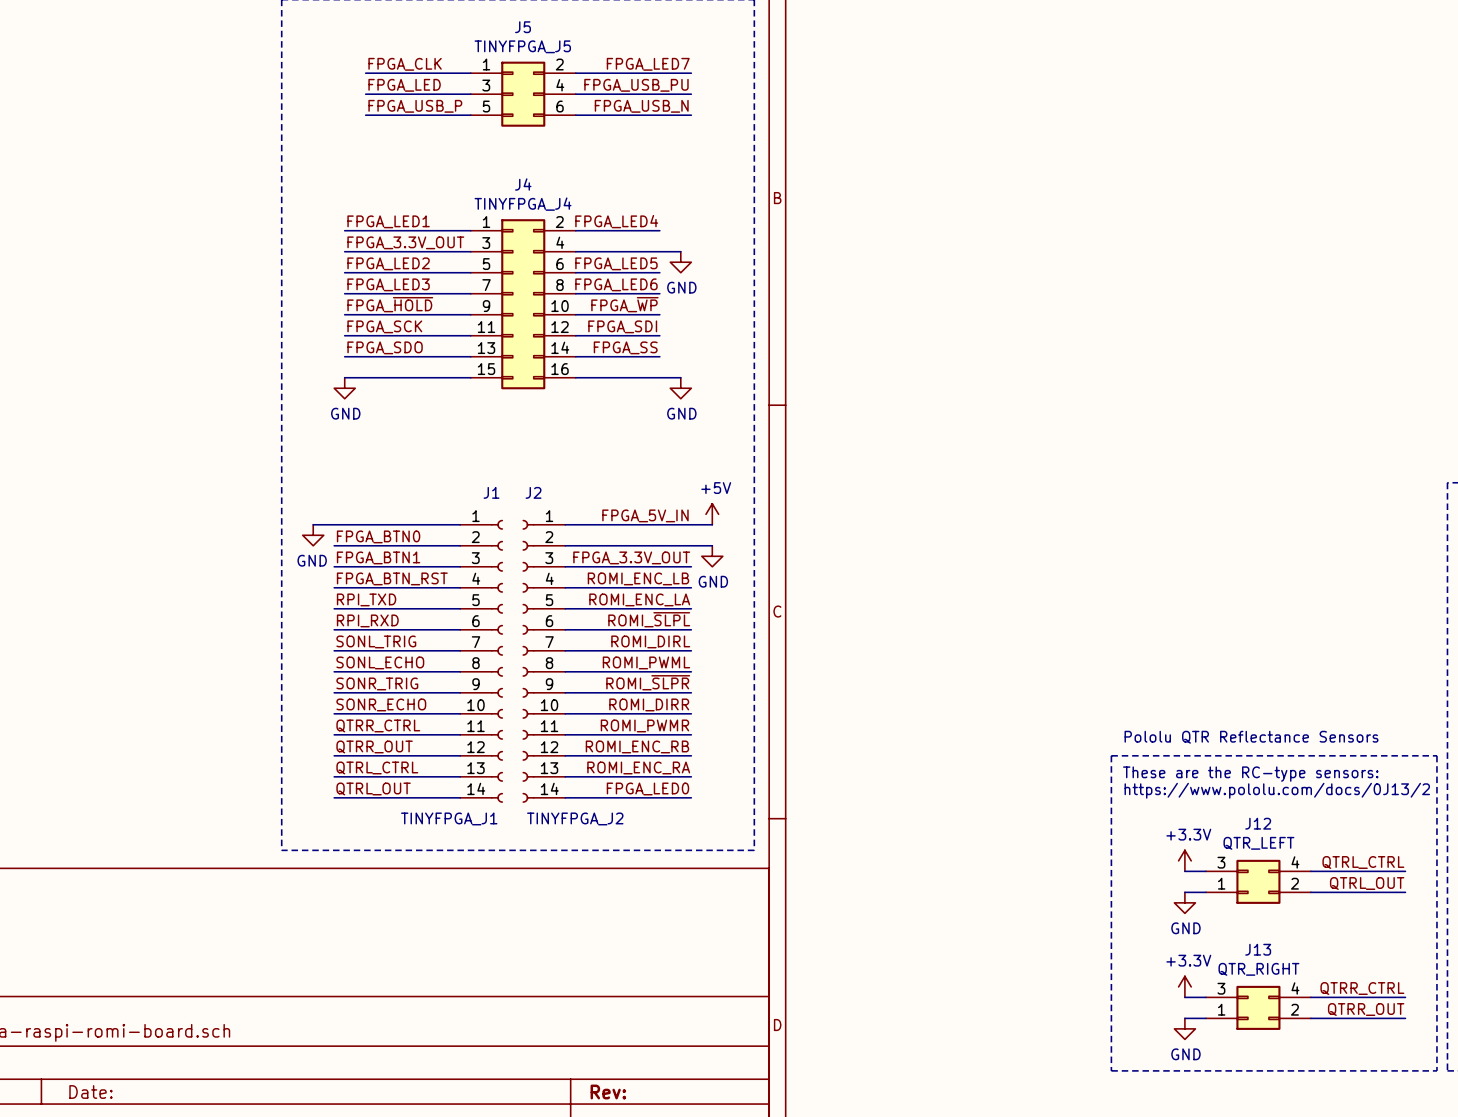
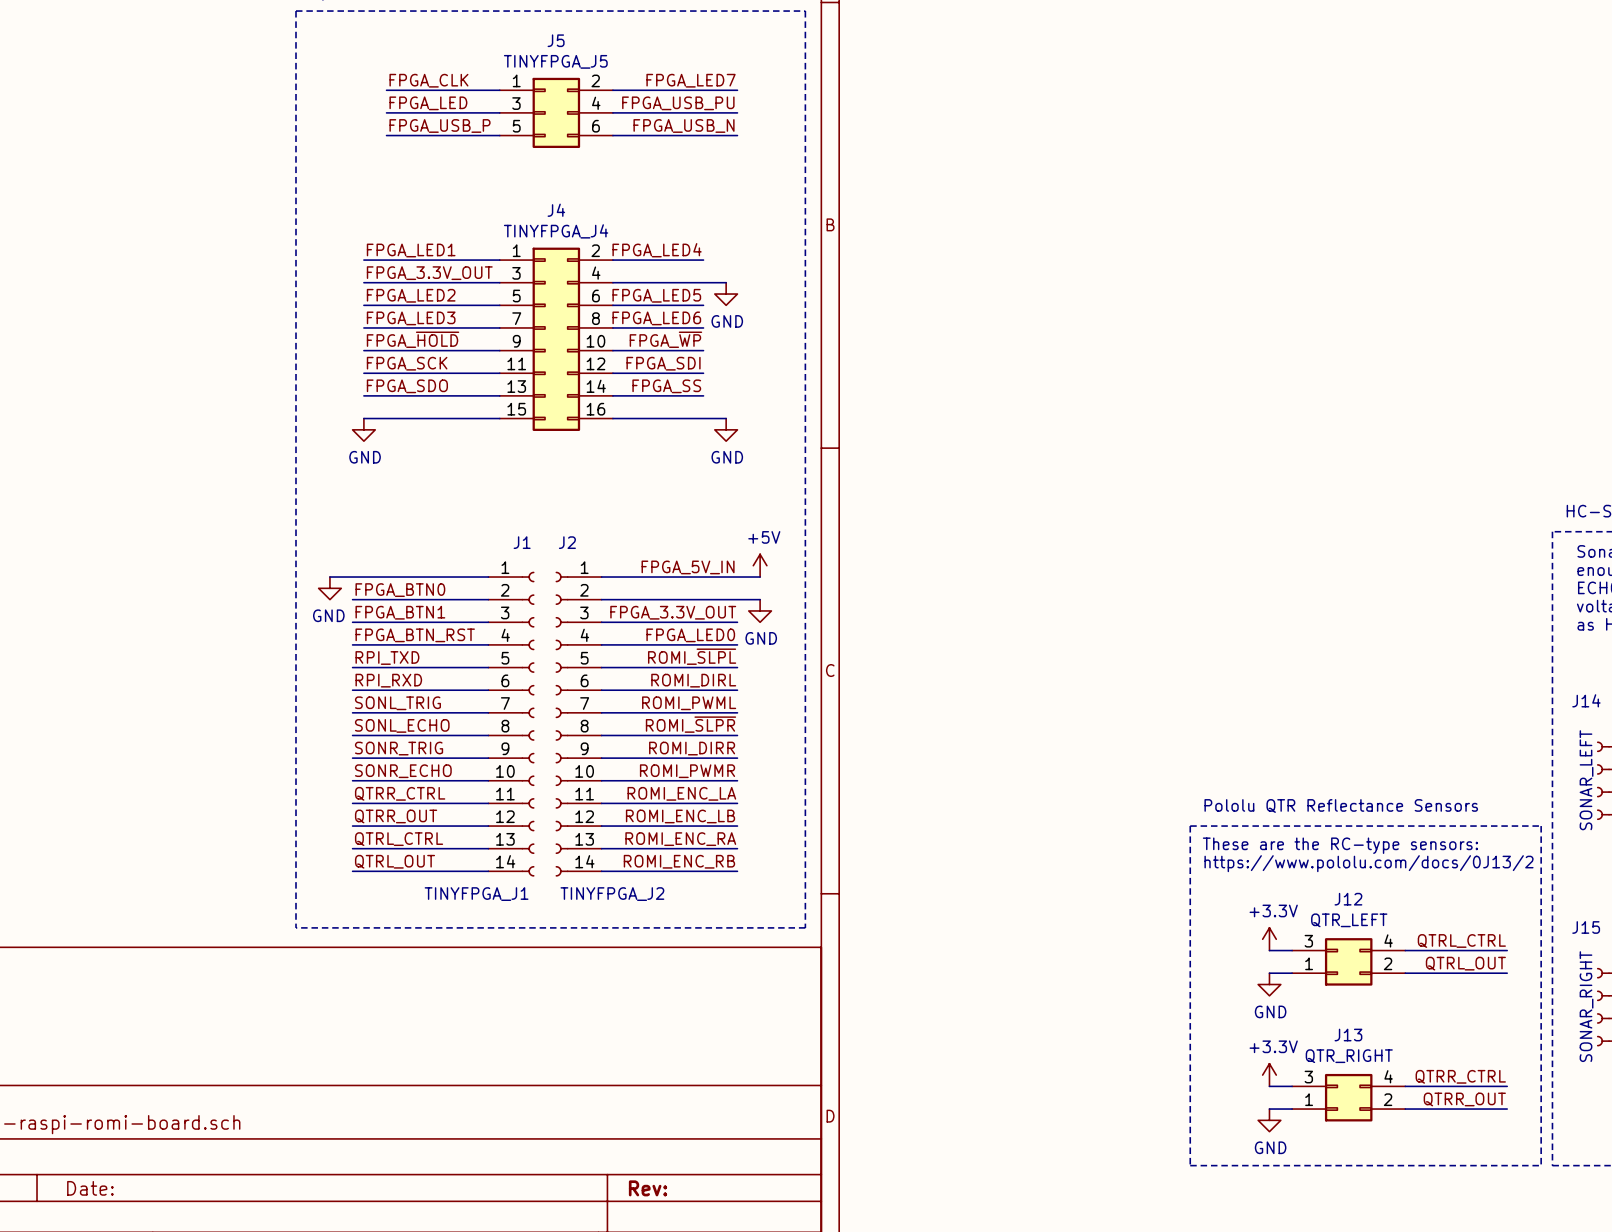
label: ROMI_ENC_LB (638, 578) -> FPGA_LED0 (690, 635)
label: ROMI_ENC_LA (639, 599) -> ROMI_~{SLPL} (692, 656)
label: ROMI_~{SLPL} (649, 619) -> ROMI_DIRL (693, 680)
label: ROMI_DIRL (650, 641) -> ROMI_PWML (689, 703)
label: ROMI_PWML (646, 662) -> ROMI_~{SLPR} (690, 724)
label: ROMI_~{SLPR} (648, 682) -> ROMI_DIRR (692, 748)
label: ROMI_DIRR (649, 704) -> ROMI_PWMR (687, 771)
label: ROMI_PWMR (644, 725) -> ROMI_ENC_LA (681, 793)
label: ROMI_ENC_RB (637, 746) -> ROMI_ENC_LB (680, 816)
label: FPGA_LED0 (647, 788) -> ROMI_ENC_RB (679, 861)

